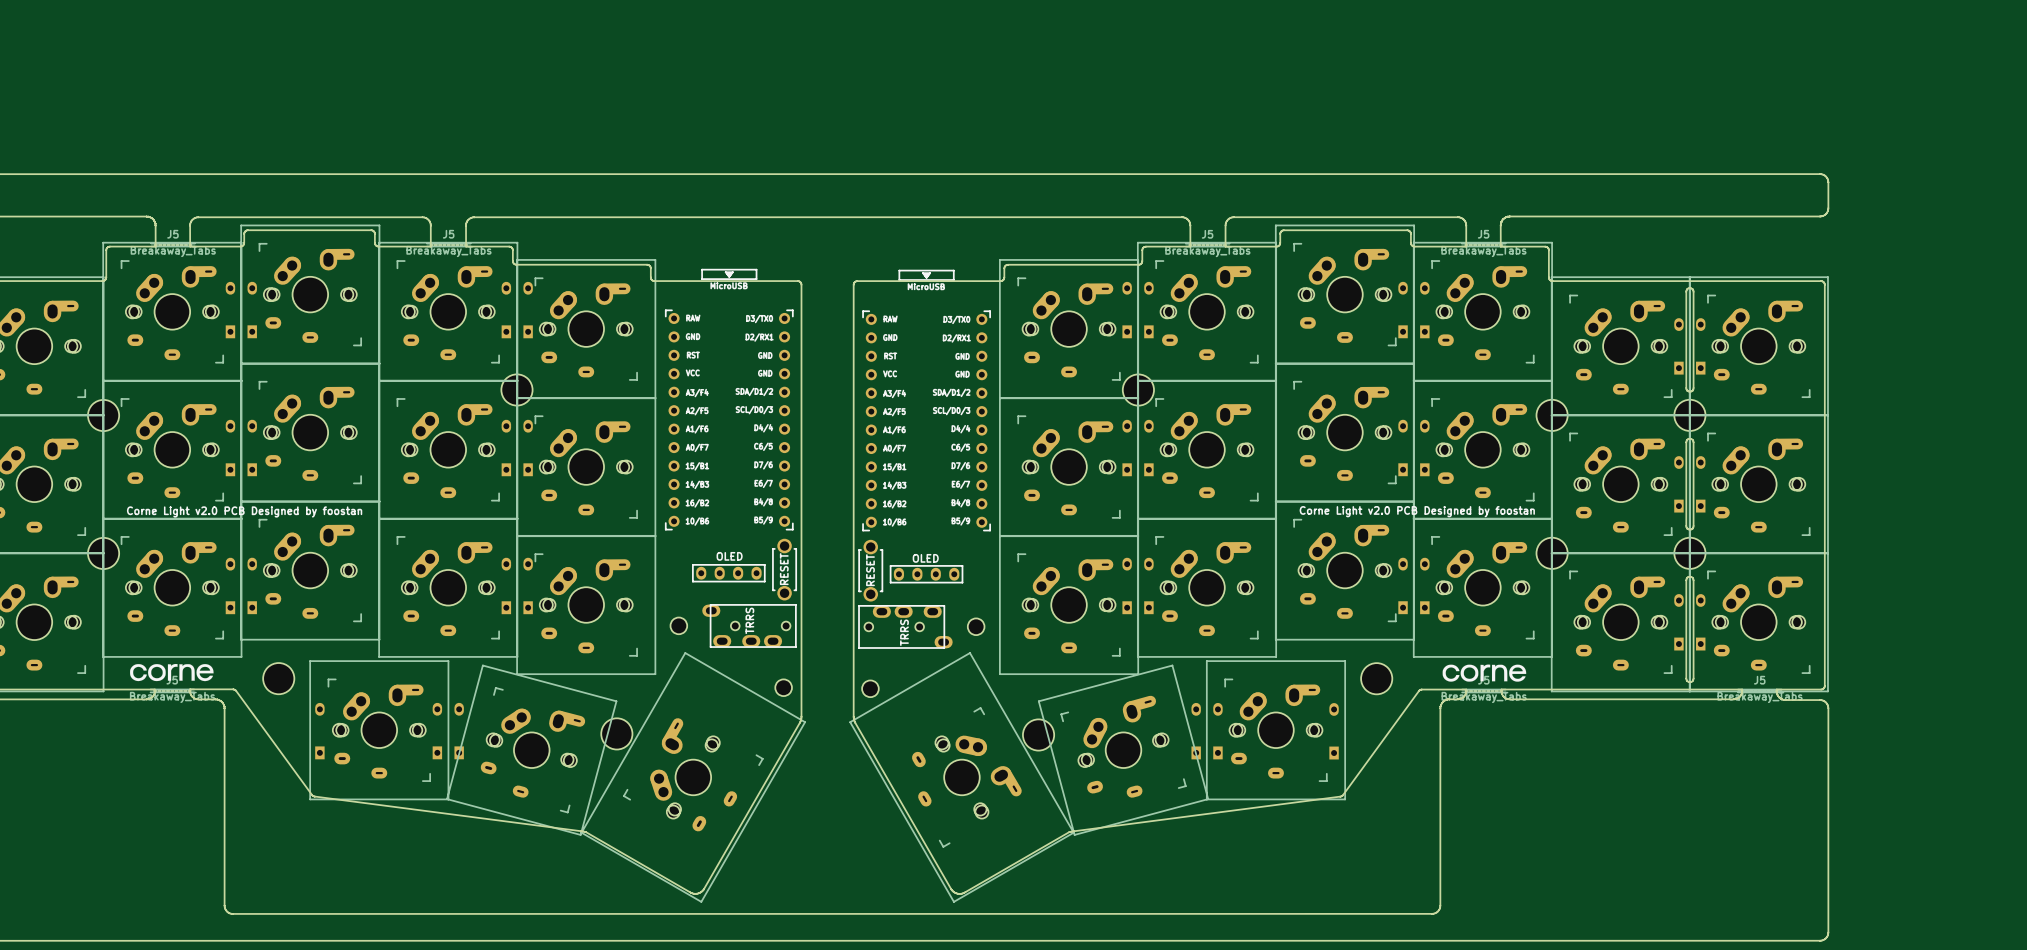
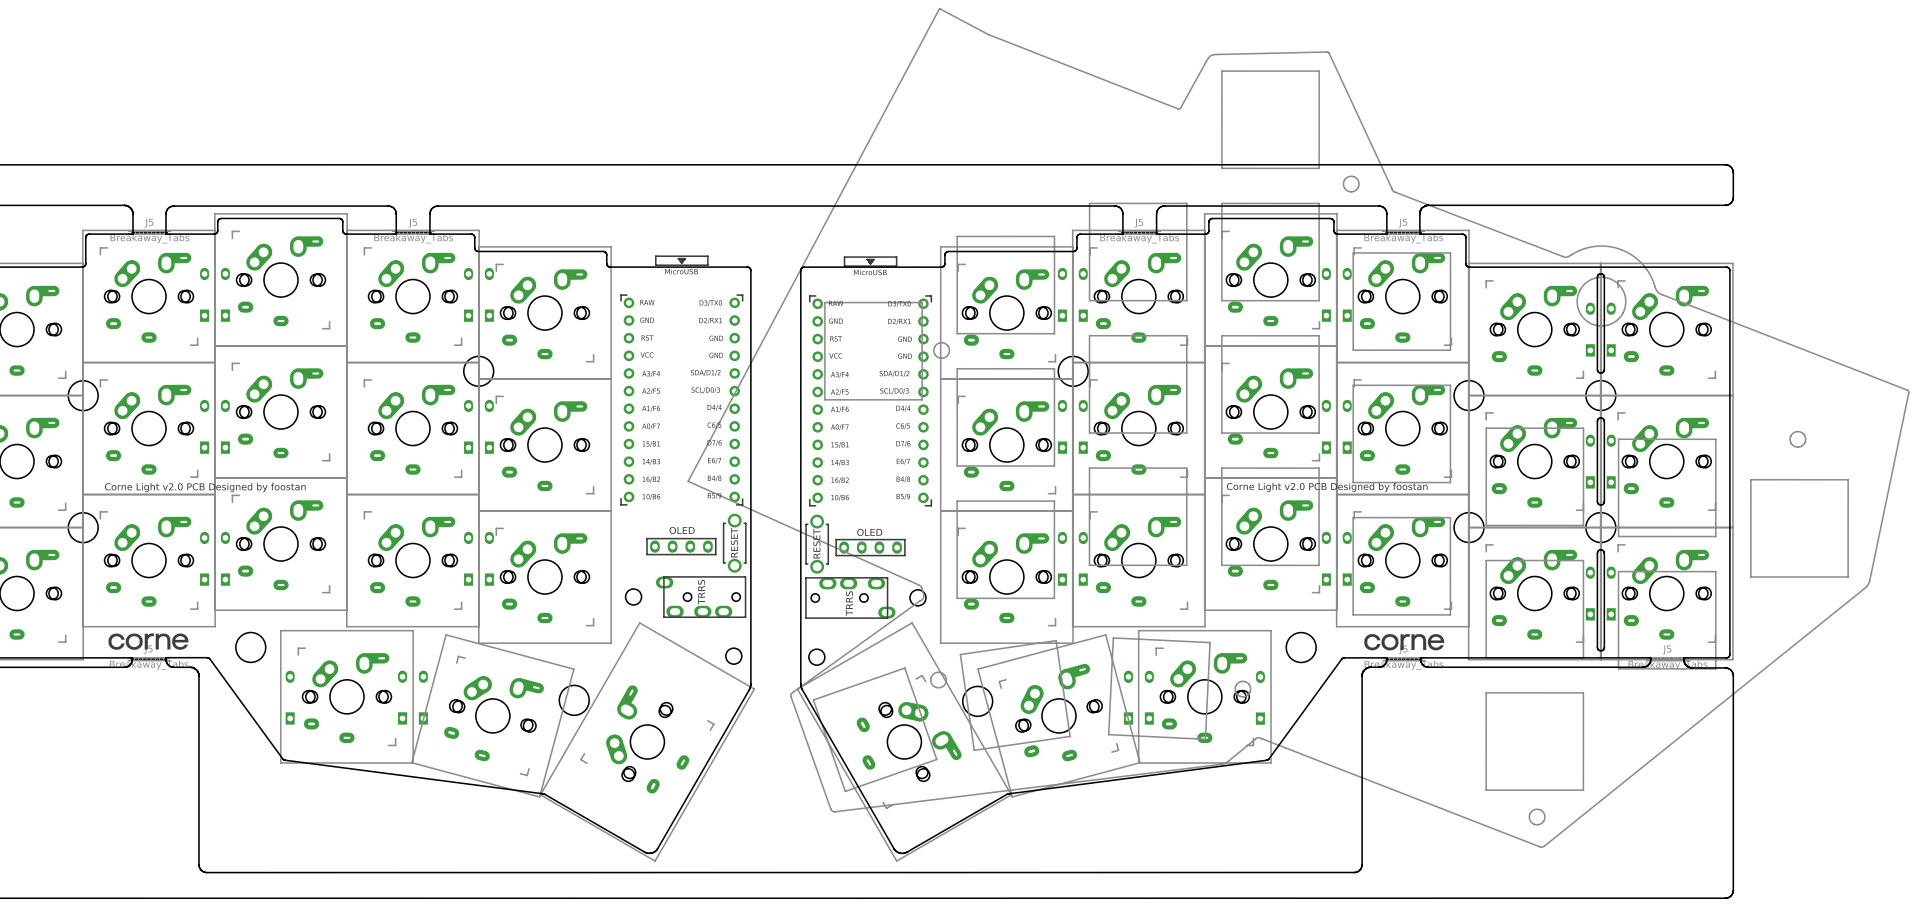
line: none -> (939, 8) (688, 481) (918, 584) (921, 588) (923, 596) (922, 599) (790, 694) (832, 811) (1222, 764) (1258, 737) (1542, 847) (1867, 584) (1907, 390) (1660, 294) (1656, 290) (1650, 274) (1642, 264) (1632, 255) (1621, 249) (1608, 246) (1595, 246) (1564, 257) (1393, 191) (1328, 52) (1211, 55) (1178, 109) (988, 34) (939, 8)
line: none -> (1221, 71) (1319, 71) (1319, 168) (1221, 168) (1221, 71)
line: none -> (1354, 177) (1348, 176) (1344, 180) (1343, 186) (1347, 190) (1353, 191) (1358, 187) (1358, 181) (1354, 177)
line: none -> (1089, 203) (1186, 203) (1186, 300) (1089, 300) (1089, 203)
line: none -> (1221, 203) (1221, 300) (1319, 300) (1319, 203) (1221, 203)
line: none -> (957, 236) (1054, 236) (1054, 333) (957, 333) (957, 236)
line: none -> (1353, 252) (1450, 253) (1450, 350) (1353, 350) (1353, 252)
line: none -> (1600, 277) (1610, 278) (1618, 283) (1623, 291) (1625, 300) (1624, 310) (1619, 318) (1611, 323) (1602, 325) (1592, 324) (1584, 319) (1579, 311) (1577, 302) (1578, 293) (1583, 285) (1591, 279) (1600, 277)
line: none -> (824, 302) (922, 302) (922, 399) (824, 399) (824, 302)
line: none -> (1089, 335) (1089, 432) (1186, 433) (1186, 335) (1089, 335)
line: none -> (1221, 335) (1221, 433) (1319, 433) (1319, 335) (1221, 335)
line: none -> (941, 342) (935, 345) (933, 350) (936, 356) (941, 358) (947, 355) (949, 350) (946, 344) (941, 342)
line: none -> (957, 368) (957, 466) (1054, 466) (1054, 368) (957, 368)
line: none -> (1353, 385) (1353, 482) (1450, 482) (1450, 385) (1353, 385)
line: none -> (1486, 428) (1583, 428) (1583, 525) (1486, 525) (1486, 428)
line: none -> (1797, 431) (1792, 434) (1790, 439) (1792, 445) (1798, 447) (1803, 444) (1805, 439) (1803, 433) (1797, 431)
line: none -> (1618, 439) (1715, 439) (1715, 536) (1618, 536) (1618, 439)
line: none -> (1089, 468) (1089, 565) (1186, 565) (1186, 468) (1089, 468)
line: none -> (1221, 468) (1221, 565) (1319, 565) (1319, 468) (1221, 468)
line: none -> (1750, 479) (1750, 576) (1848, 577) (1848, 479) (1750, 479)
line: none -> (957, 501) (957, 598) (1054, 598) (1054, 501) (957, 501)
line: none -> (1353, 517) (1353, 614) (1450, 614) (1450, 517) (1353, 517)
line: none -> (1486, 560) (1486, 657) (1583, 657) (1583, 560) (1486, 560)
line: none -> (1618, 571) (1618, 668) (1715, 668) (1715, 571) (1618, 571)
line: none -> (1113, 637) (1108, 734) (1205, 739) (1210, 642) (1113, 637)
line: none -> (1056, 640) (960, 654) (974, 750) (1070, 736) (1056, 640)
line: none -> (904, 668) (813, 700) (845, 791) (936, 759) (904, 668)
line: none -> (941, 672) (935, 673) (931, 677) (931, 683) (936, 687) (942, 686) (945, 682) (945, 676) (941, 672)
line: none -> (1241, 681) (1236, 684) (1235, 690) (1238, 695) (1244, 696) (1249, 693) (1250, 687) (1247, 682) (1241, 681)
line: none -> (1486, 692) (1486, 790) (1583, 790) (1583, 692) (1486, 692)
line: none -> (1540, 810) (1534, 809) (1530, 813) (1529, 819) (1533, 823) (1539, 824) (1543, 820) (1544, 814) (1540, 810)

